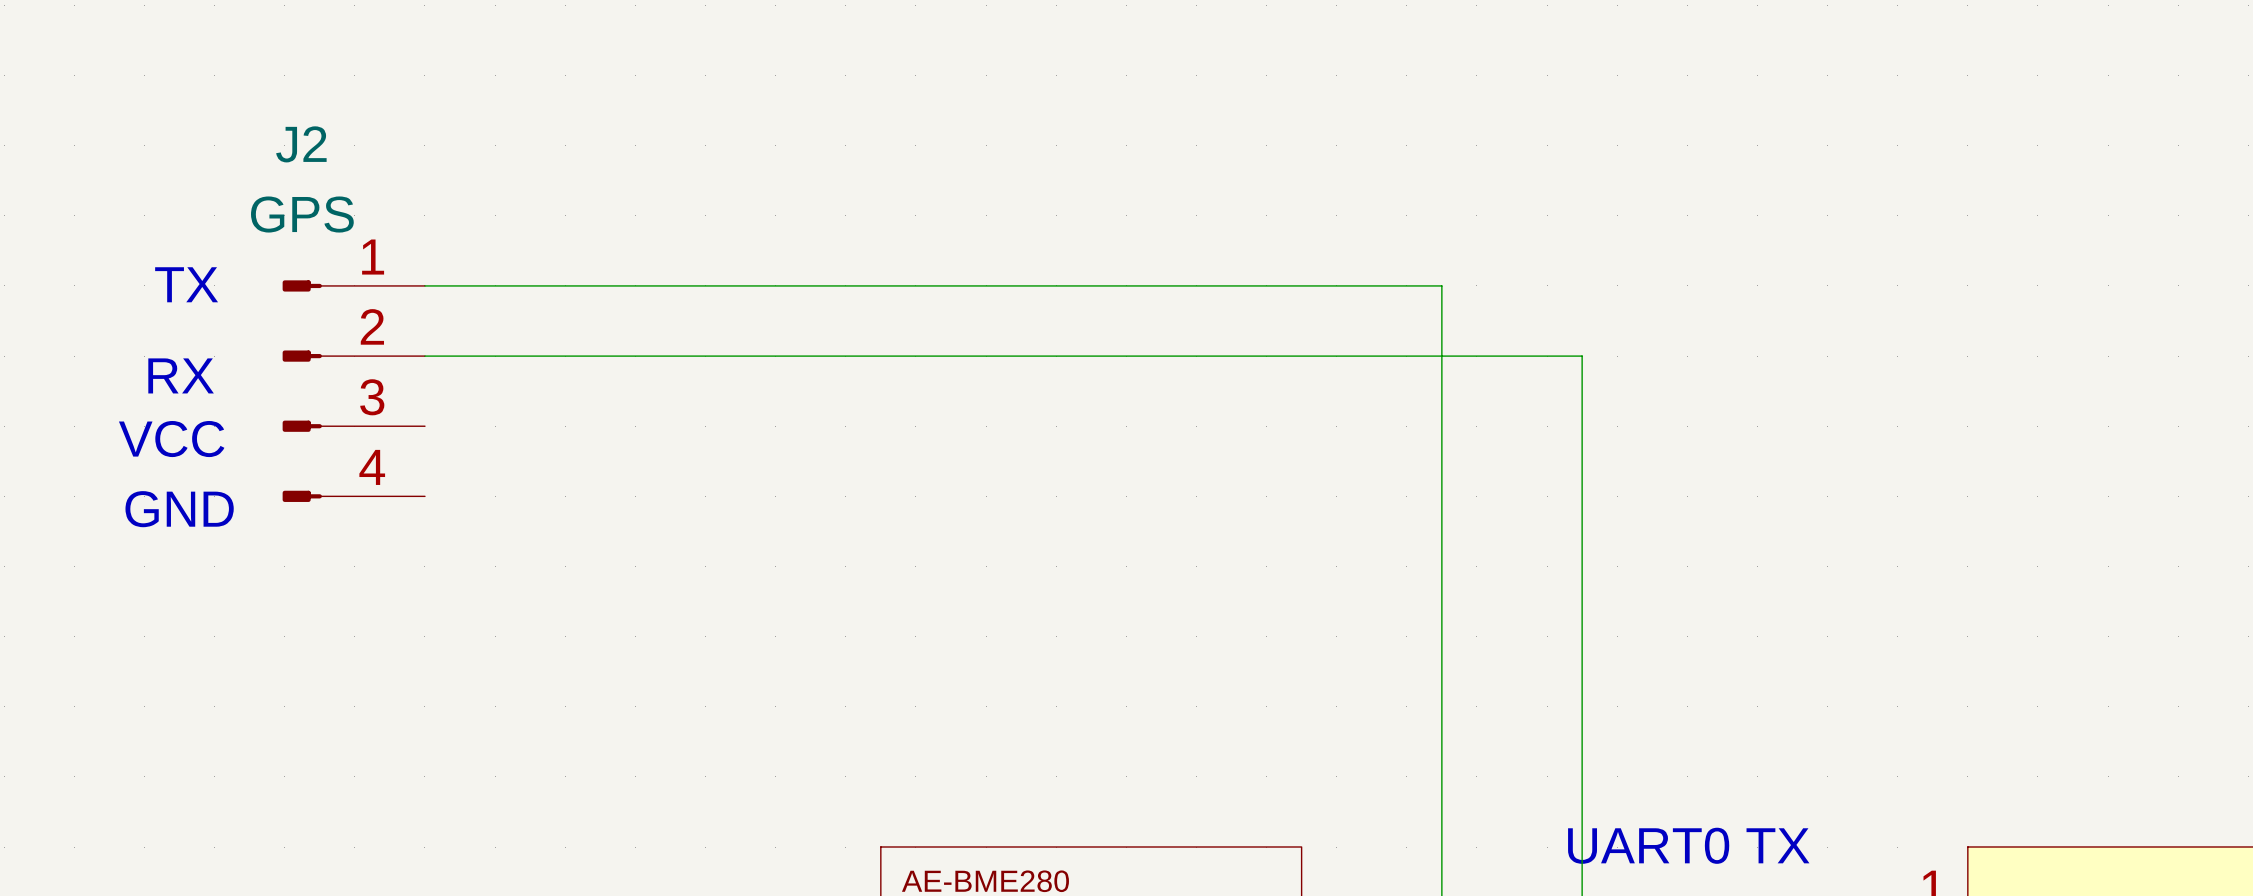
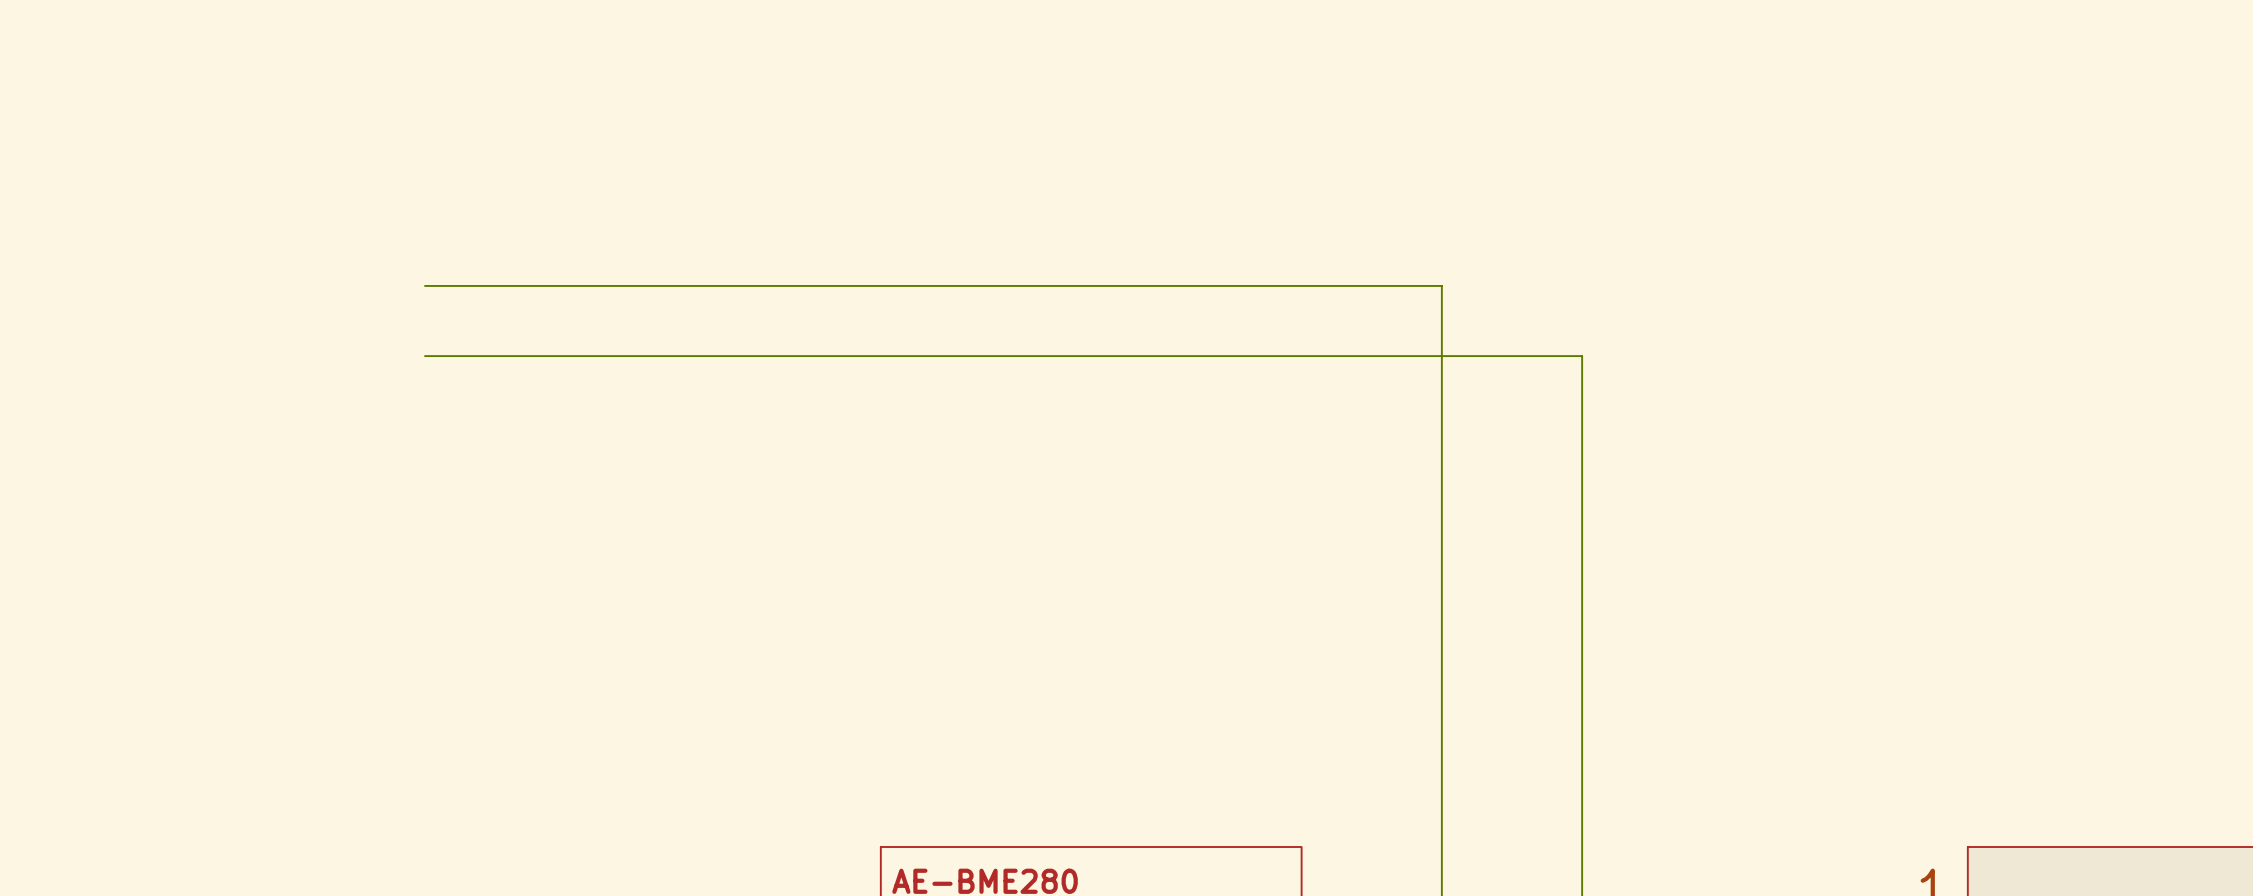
text: TX (186, 284) -> none
text: RX (181, 375) -> none
J2: GPS (353, 391) -> none
text: VCC (171, 439) -> none
text: GND (179, 509) -> none
text: UART0 TX (1688, 845) -> none

